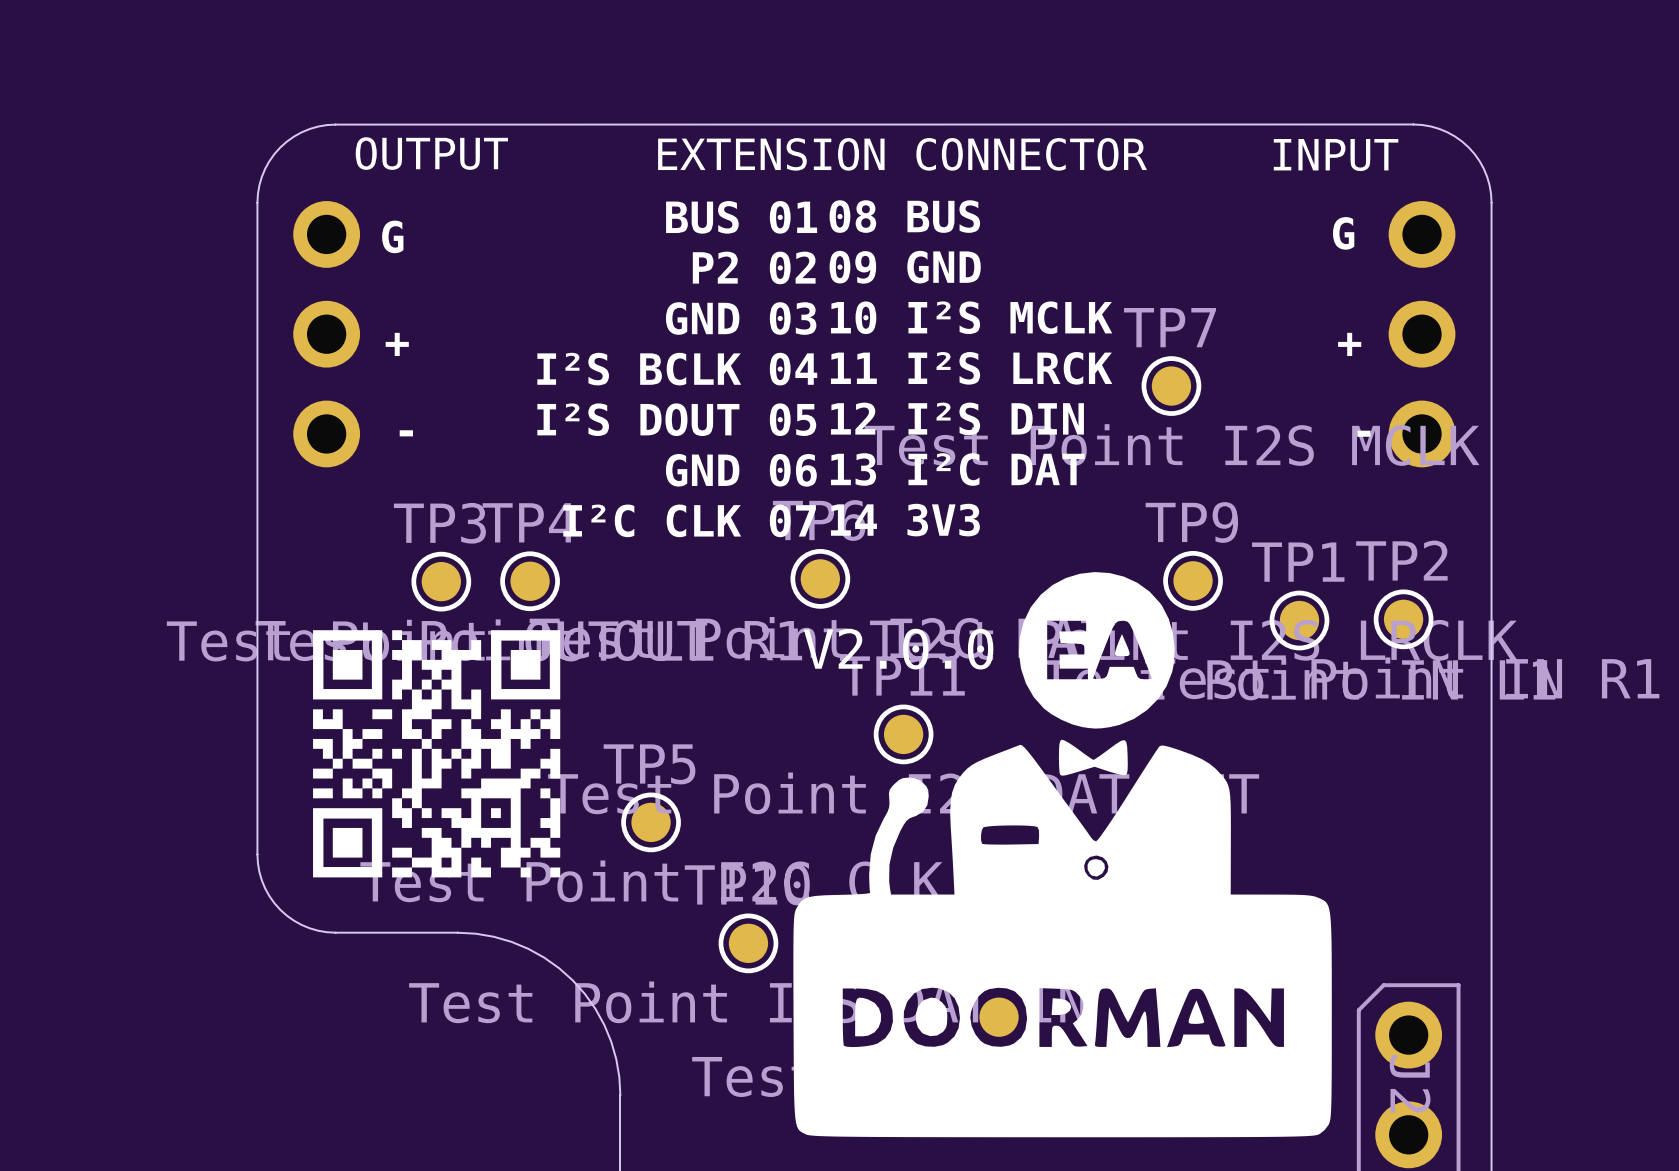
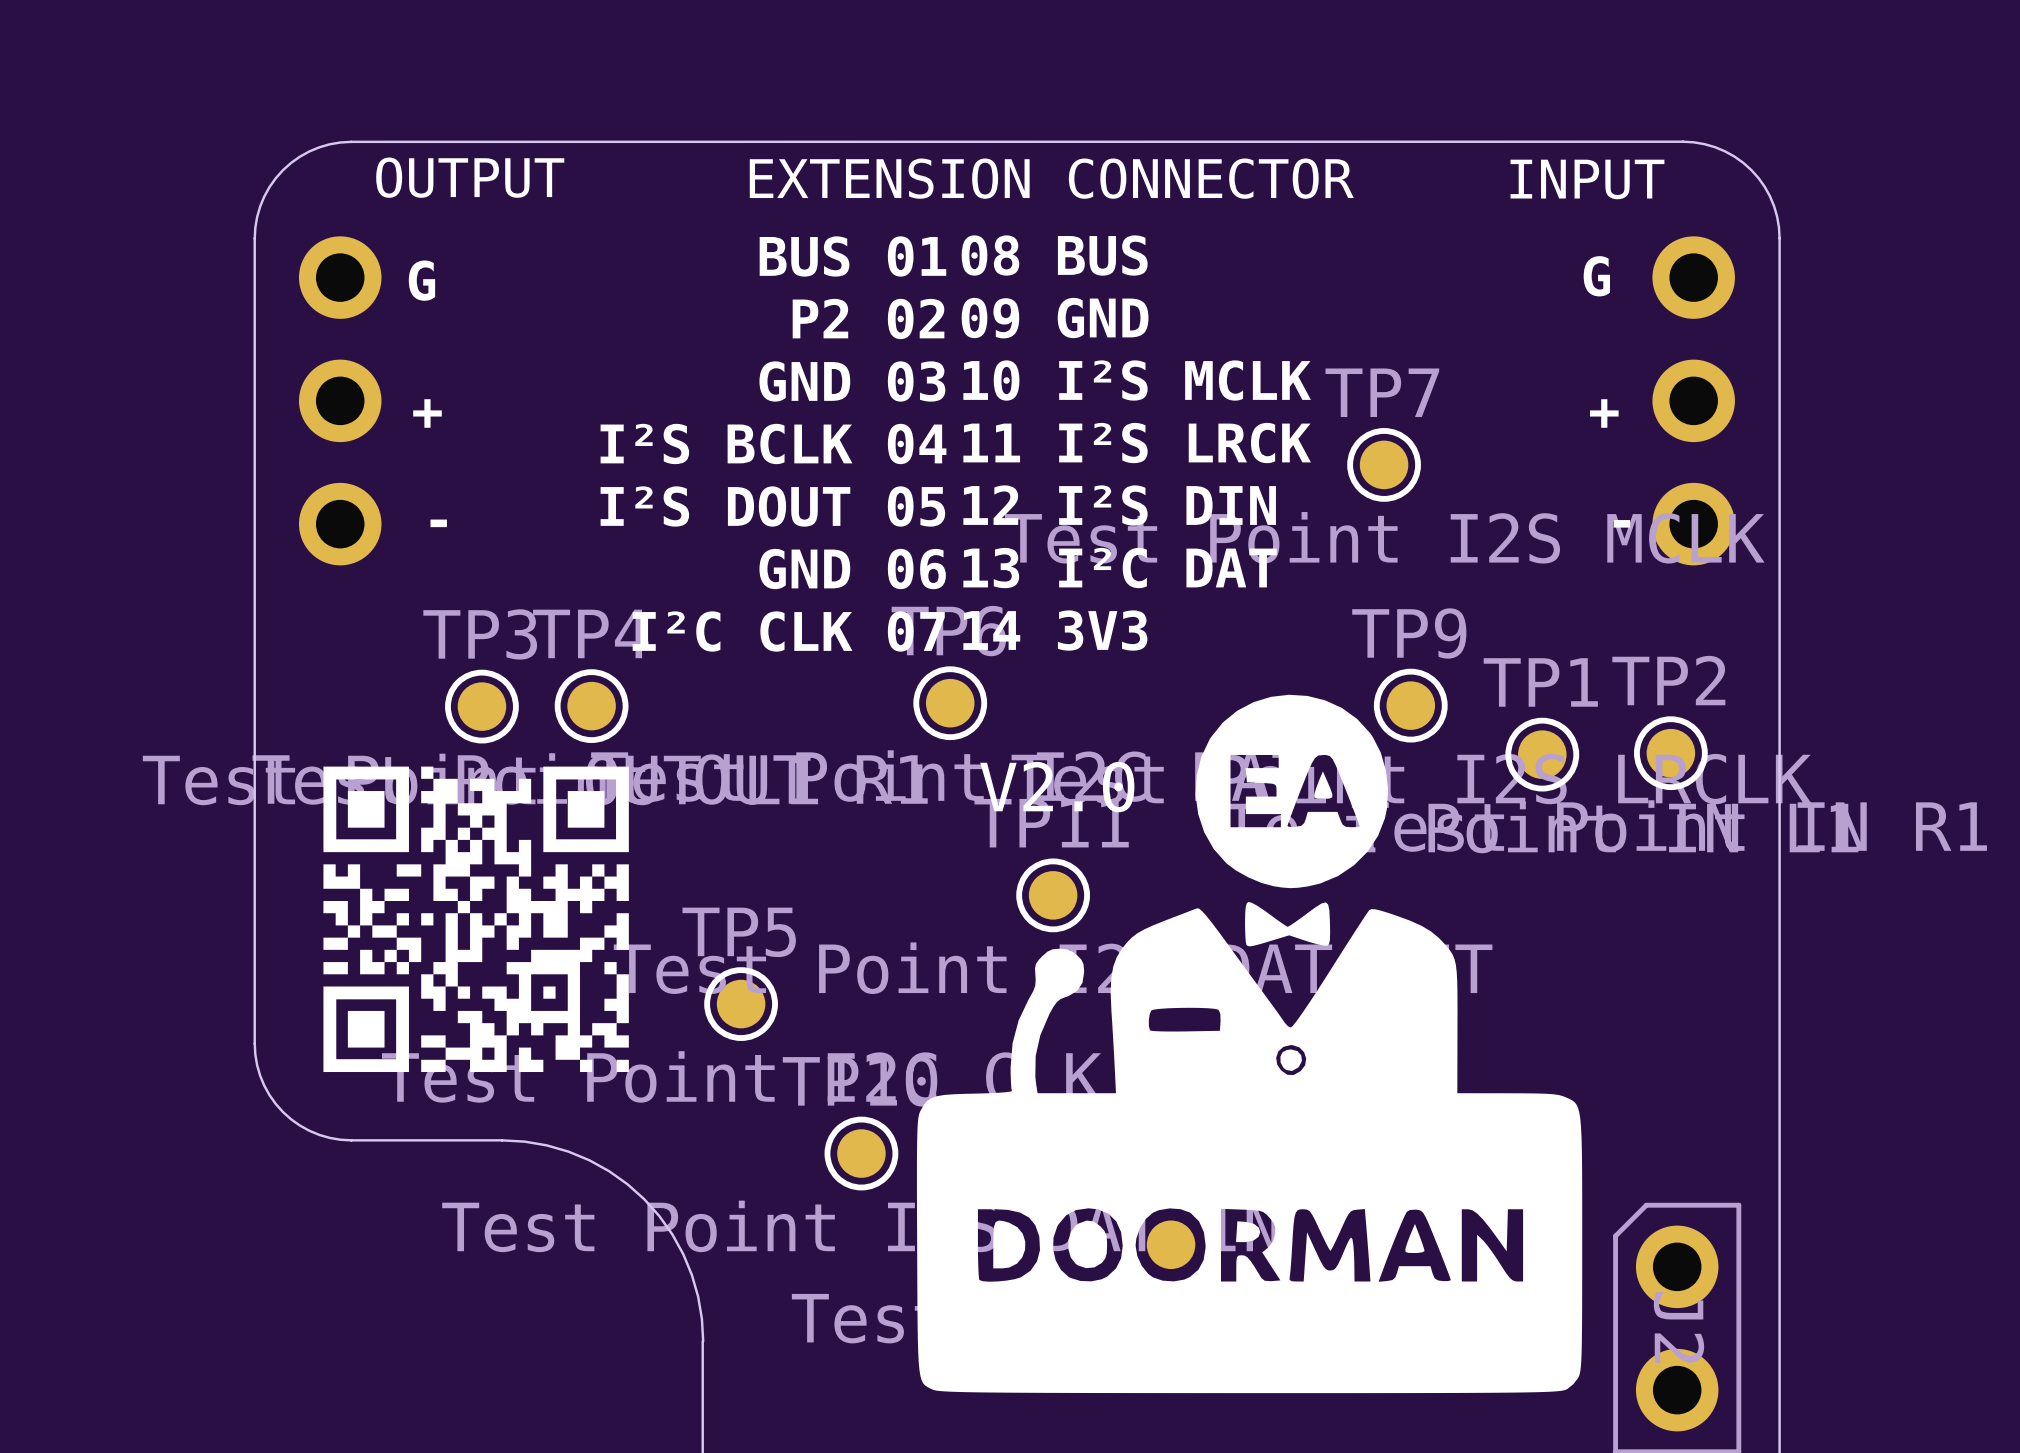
text: V2.0.0 (898, 649) -> V2.0 (1057, 787)

